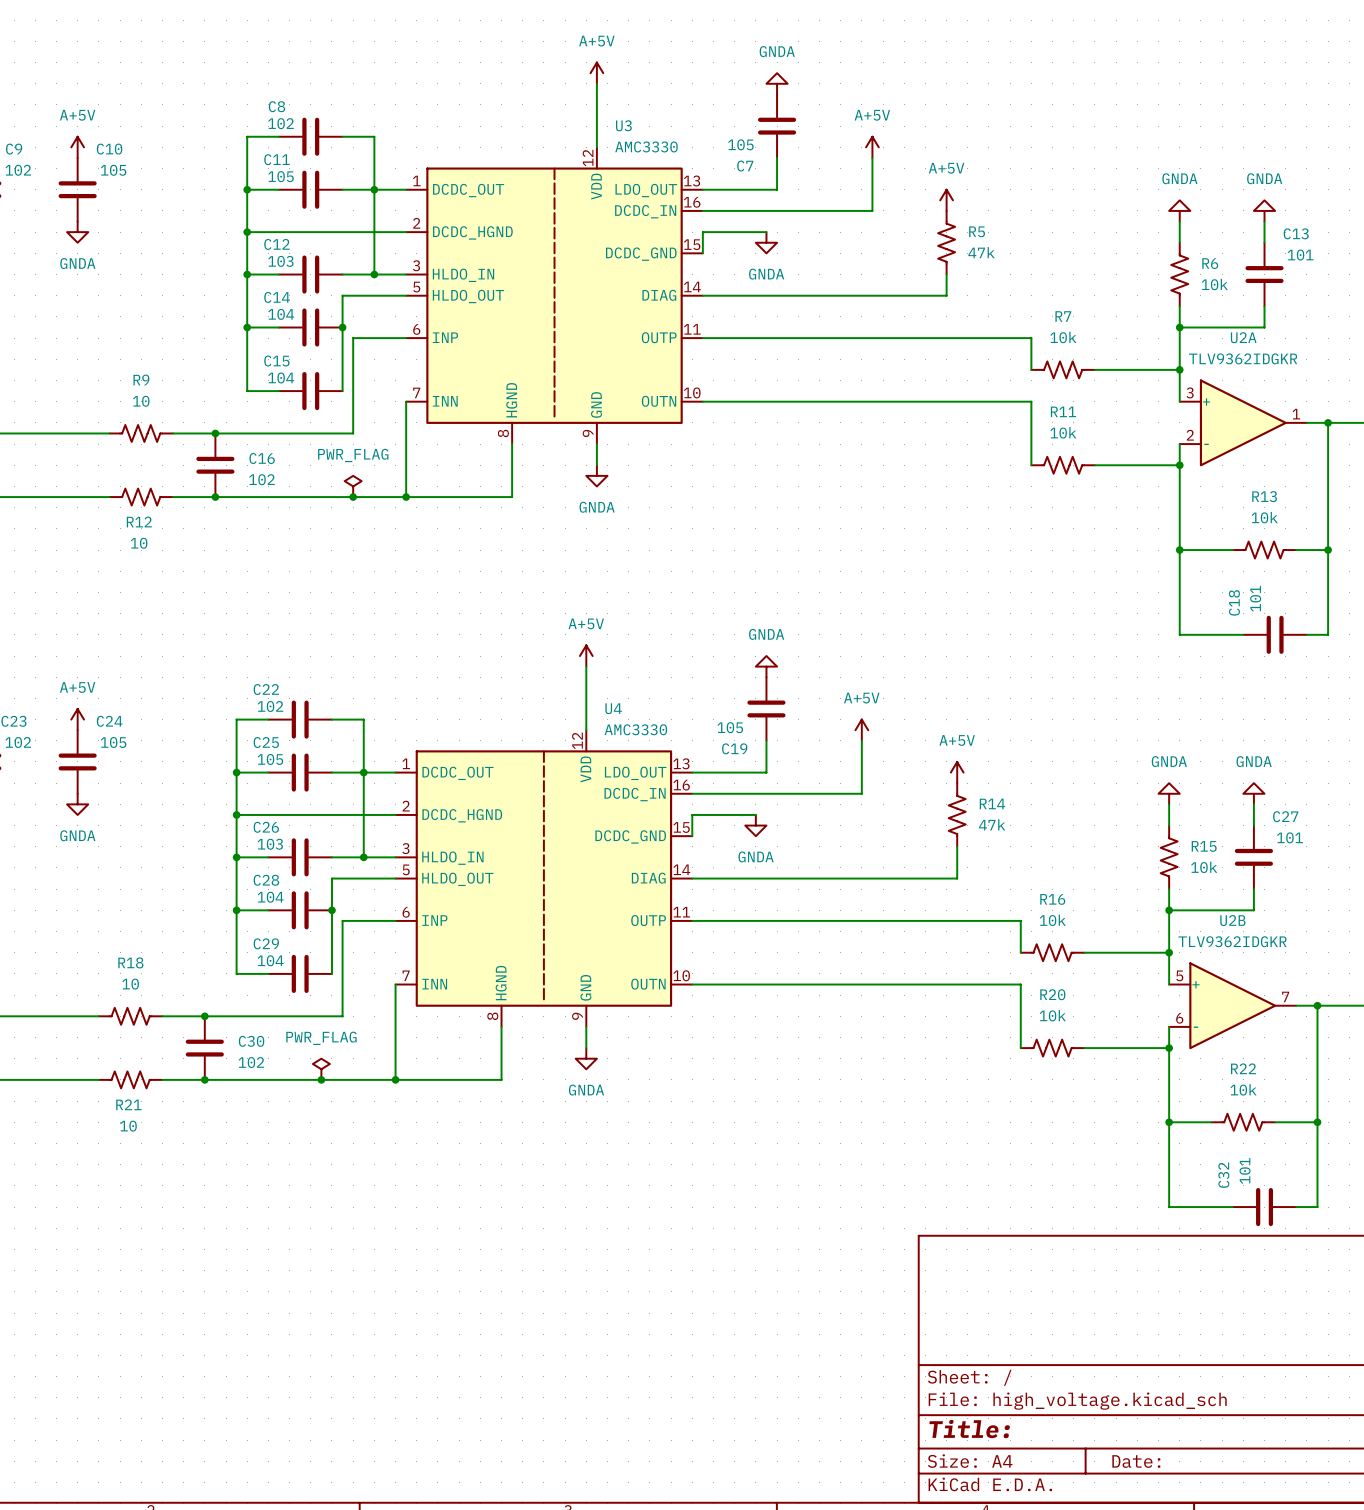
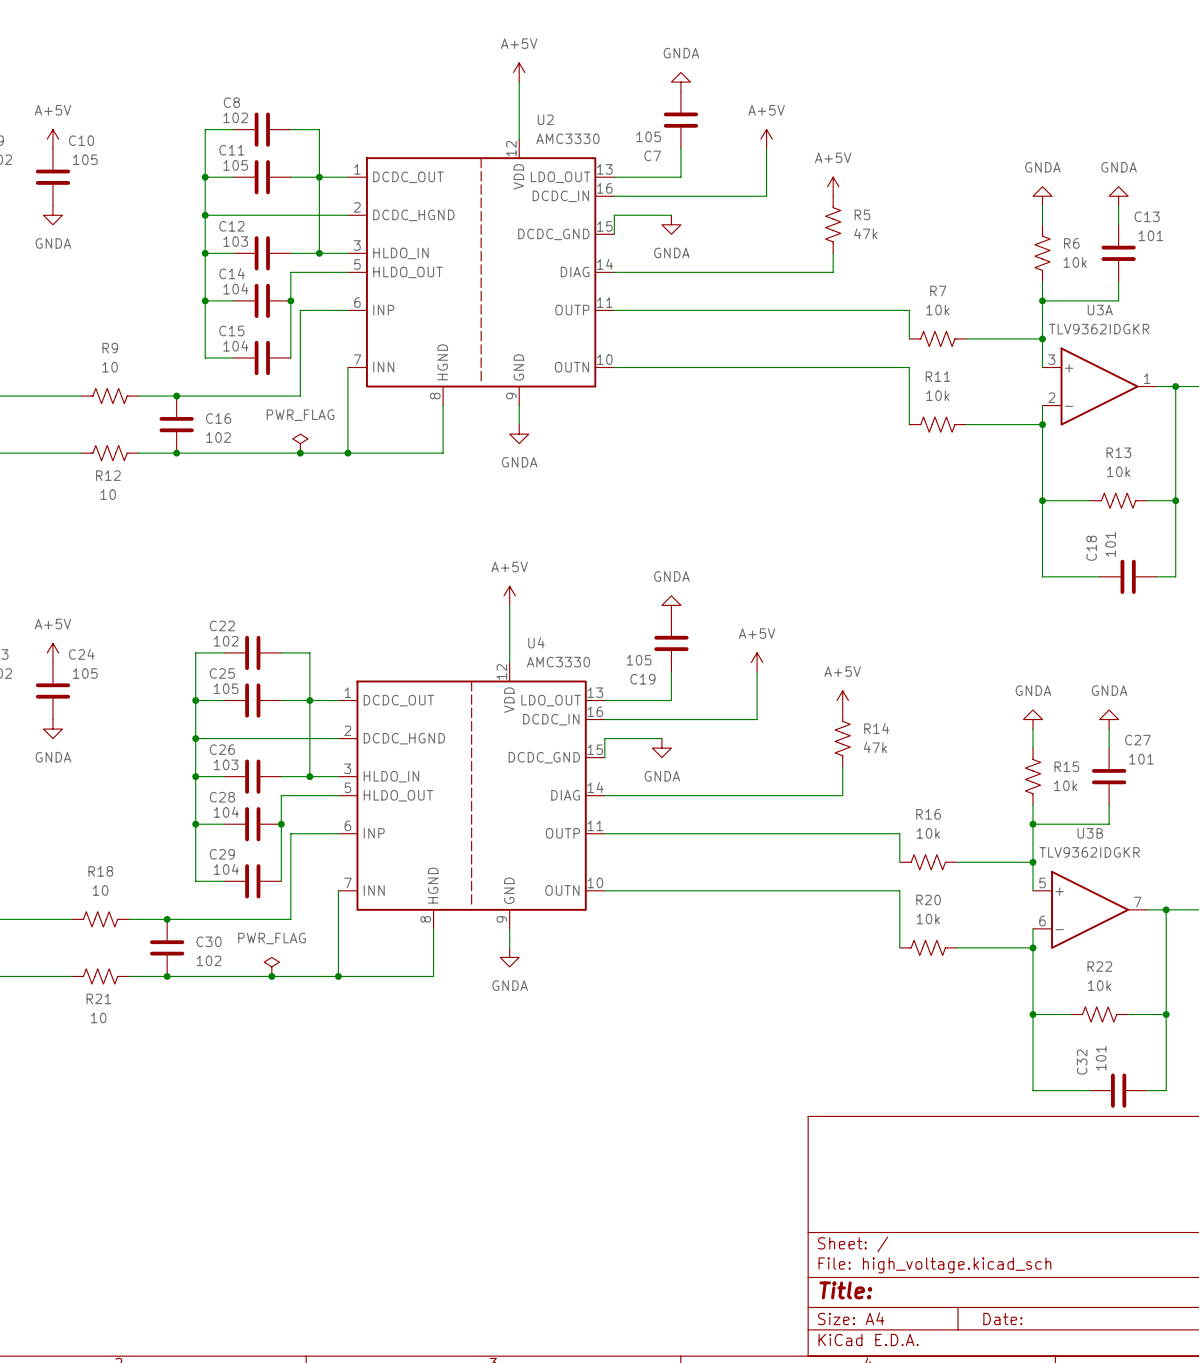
U3 name: U3 (623, 125) -> U2 (545, 119)
U2A name: U2A (1243, 337) -> U3A (1100, 310)
U2B name: U2B (1232, 920) -> U3B (1090, 833)

